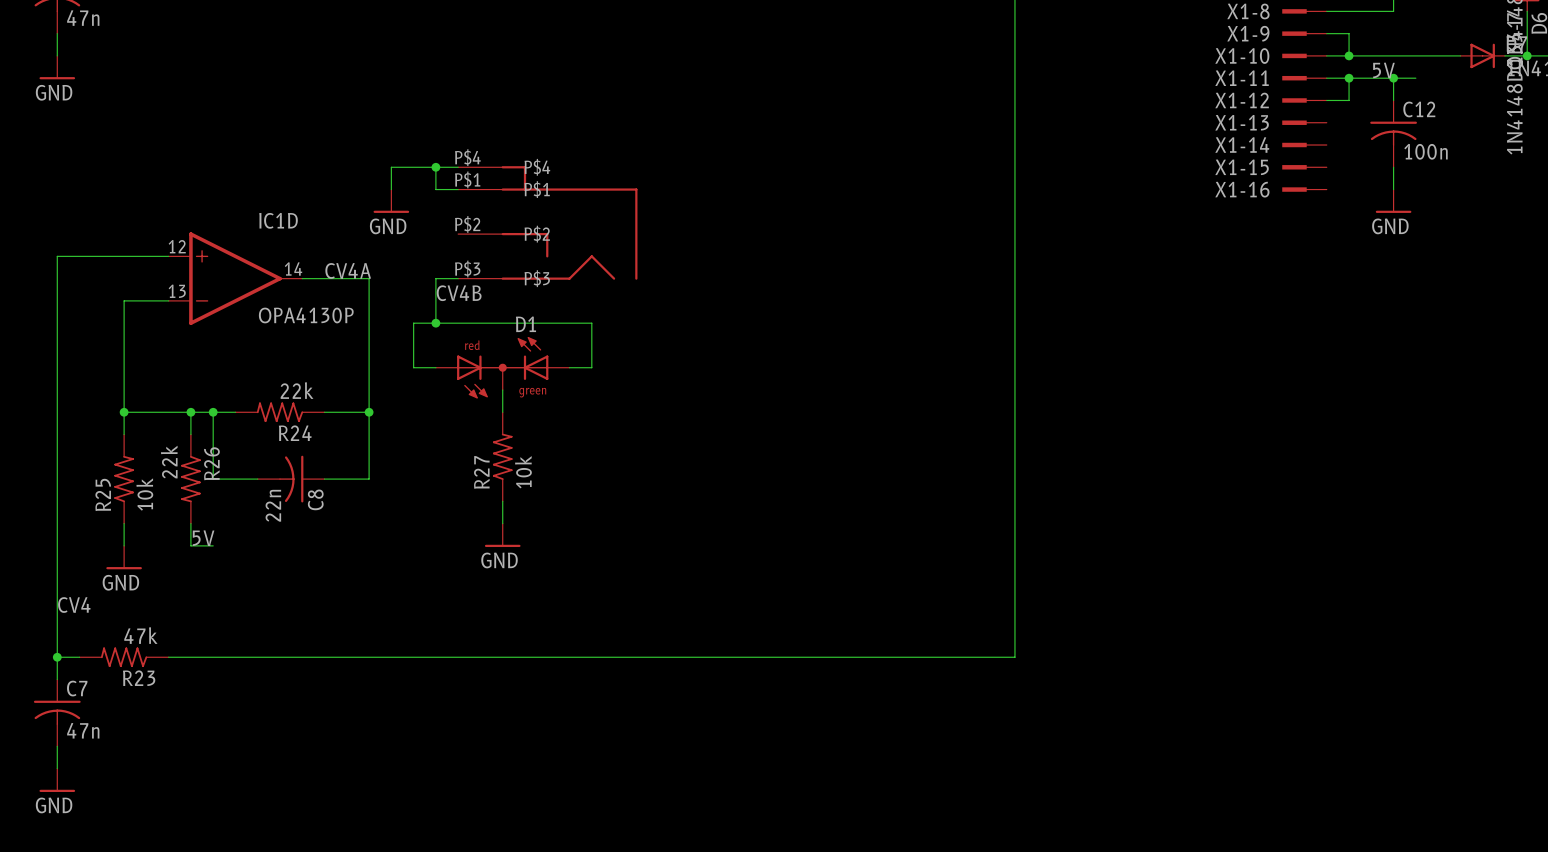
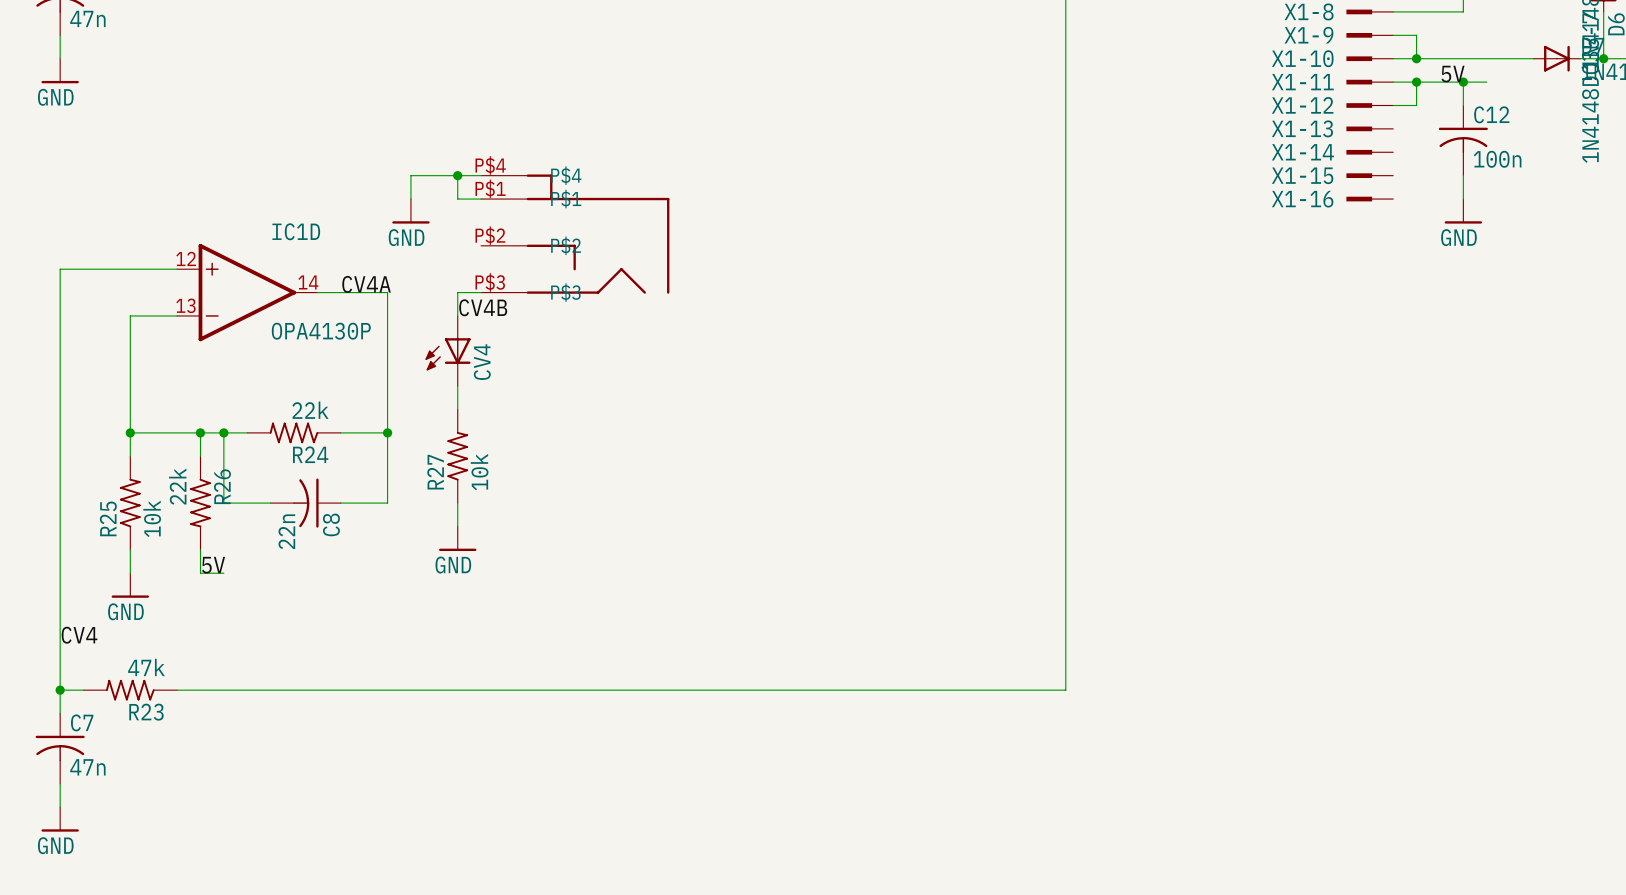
junction: (435, 323) -> none
CV4: none -> (448, 351)
wire: (435, 367) (413, 367) (413, 323) (591, 323) (591, 367) (569, 367) -> (457, 386) (457, 409)
D1: (502, 367) -> none
wire: (502, 389) (502, 412) -> none
R27 position: (502, 456) -> (457, 456)
wire: (502, 501) (502, 523) -> (457, 503) (457, 526)
power symbol position: GND (502, 535) -> GND (457, 538)

